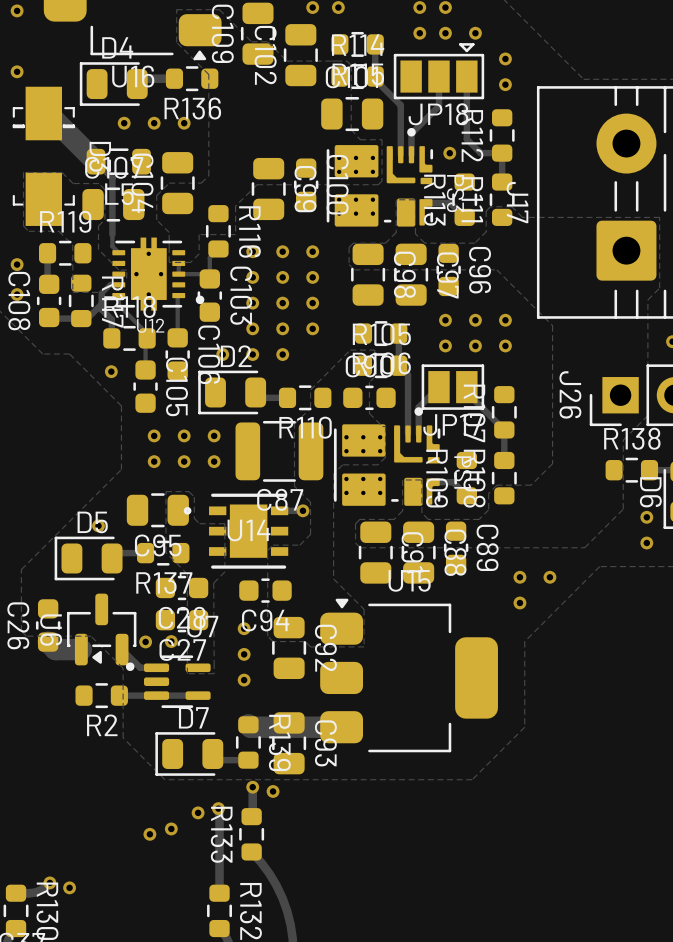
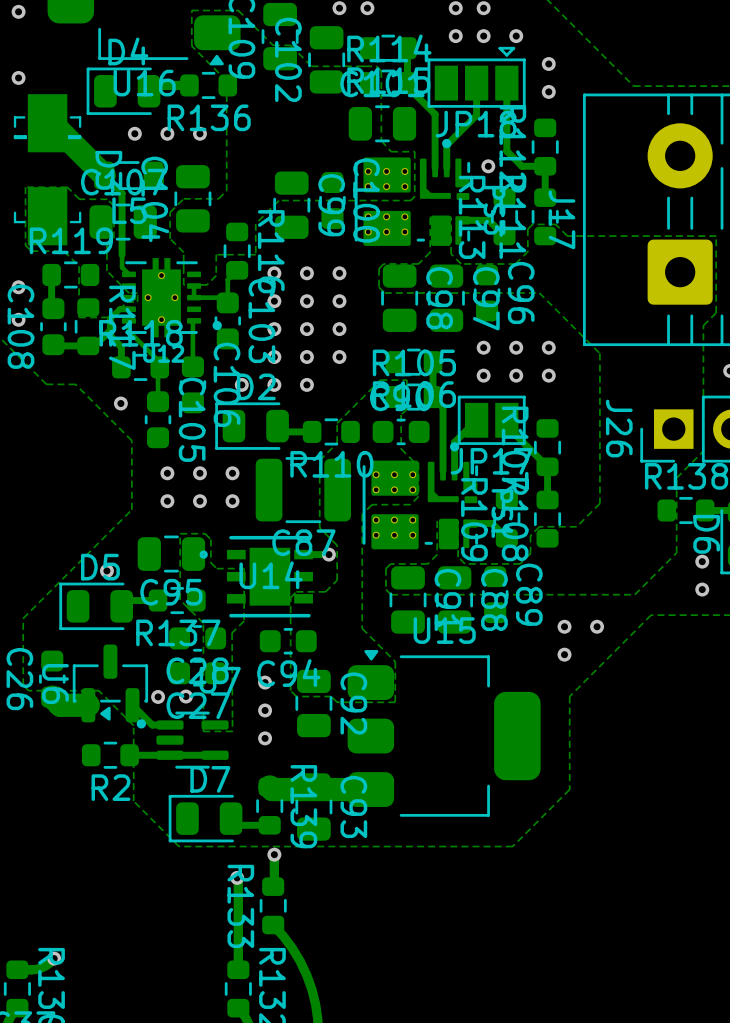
via: (273, 791) -> none
via: (198, 812) -> none
via: (171, 828) -> none
via: (149, 834) -> none
via: (69, 887) -> none

